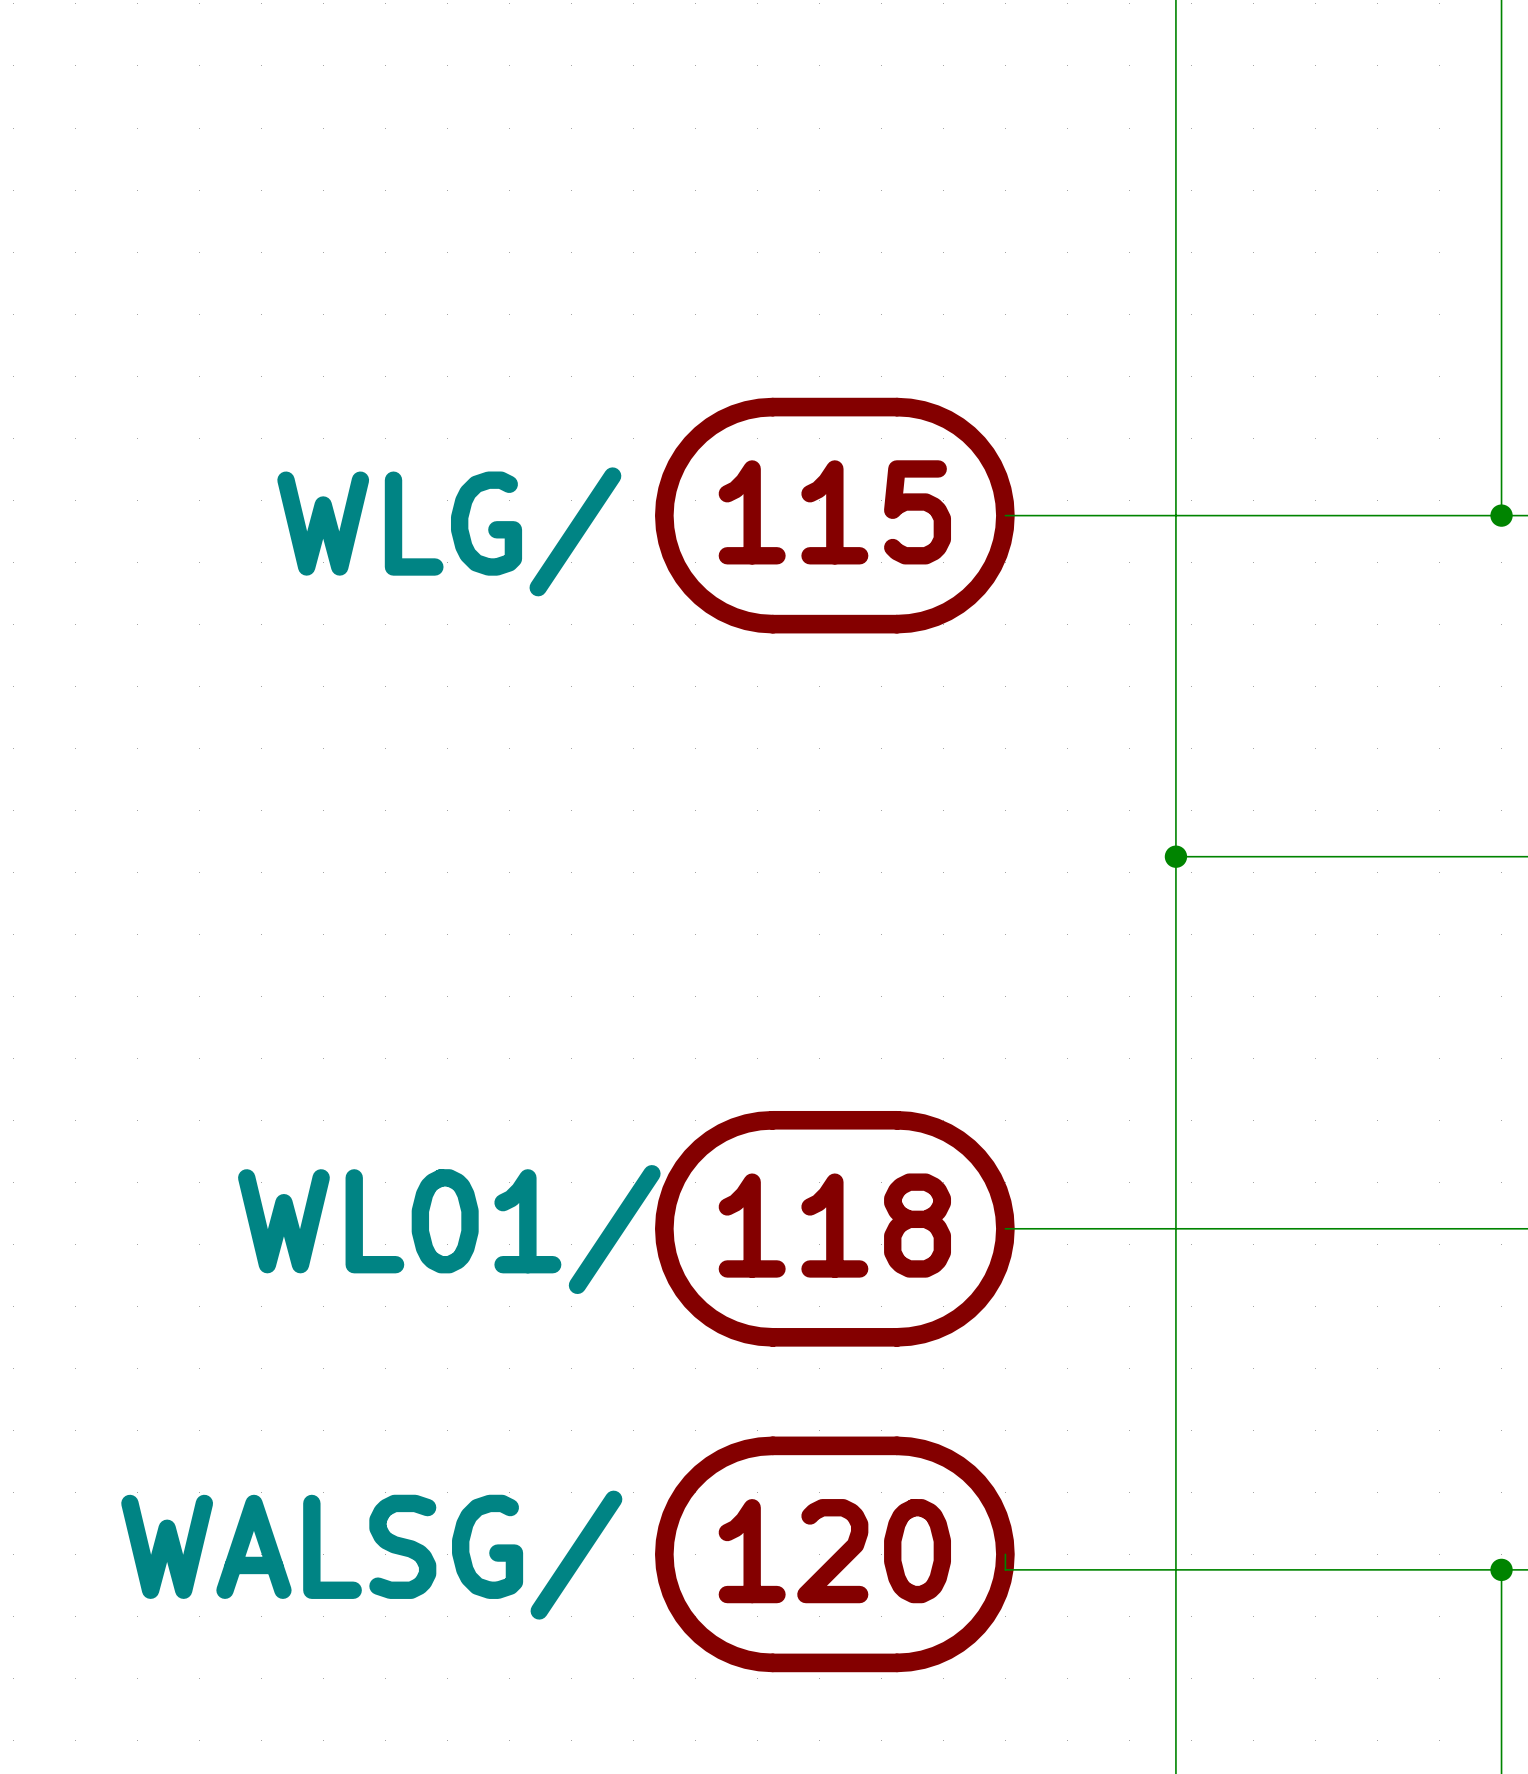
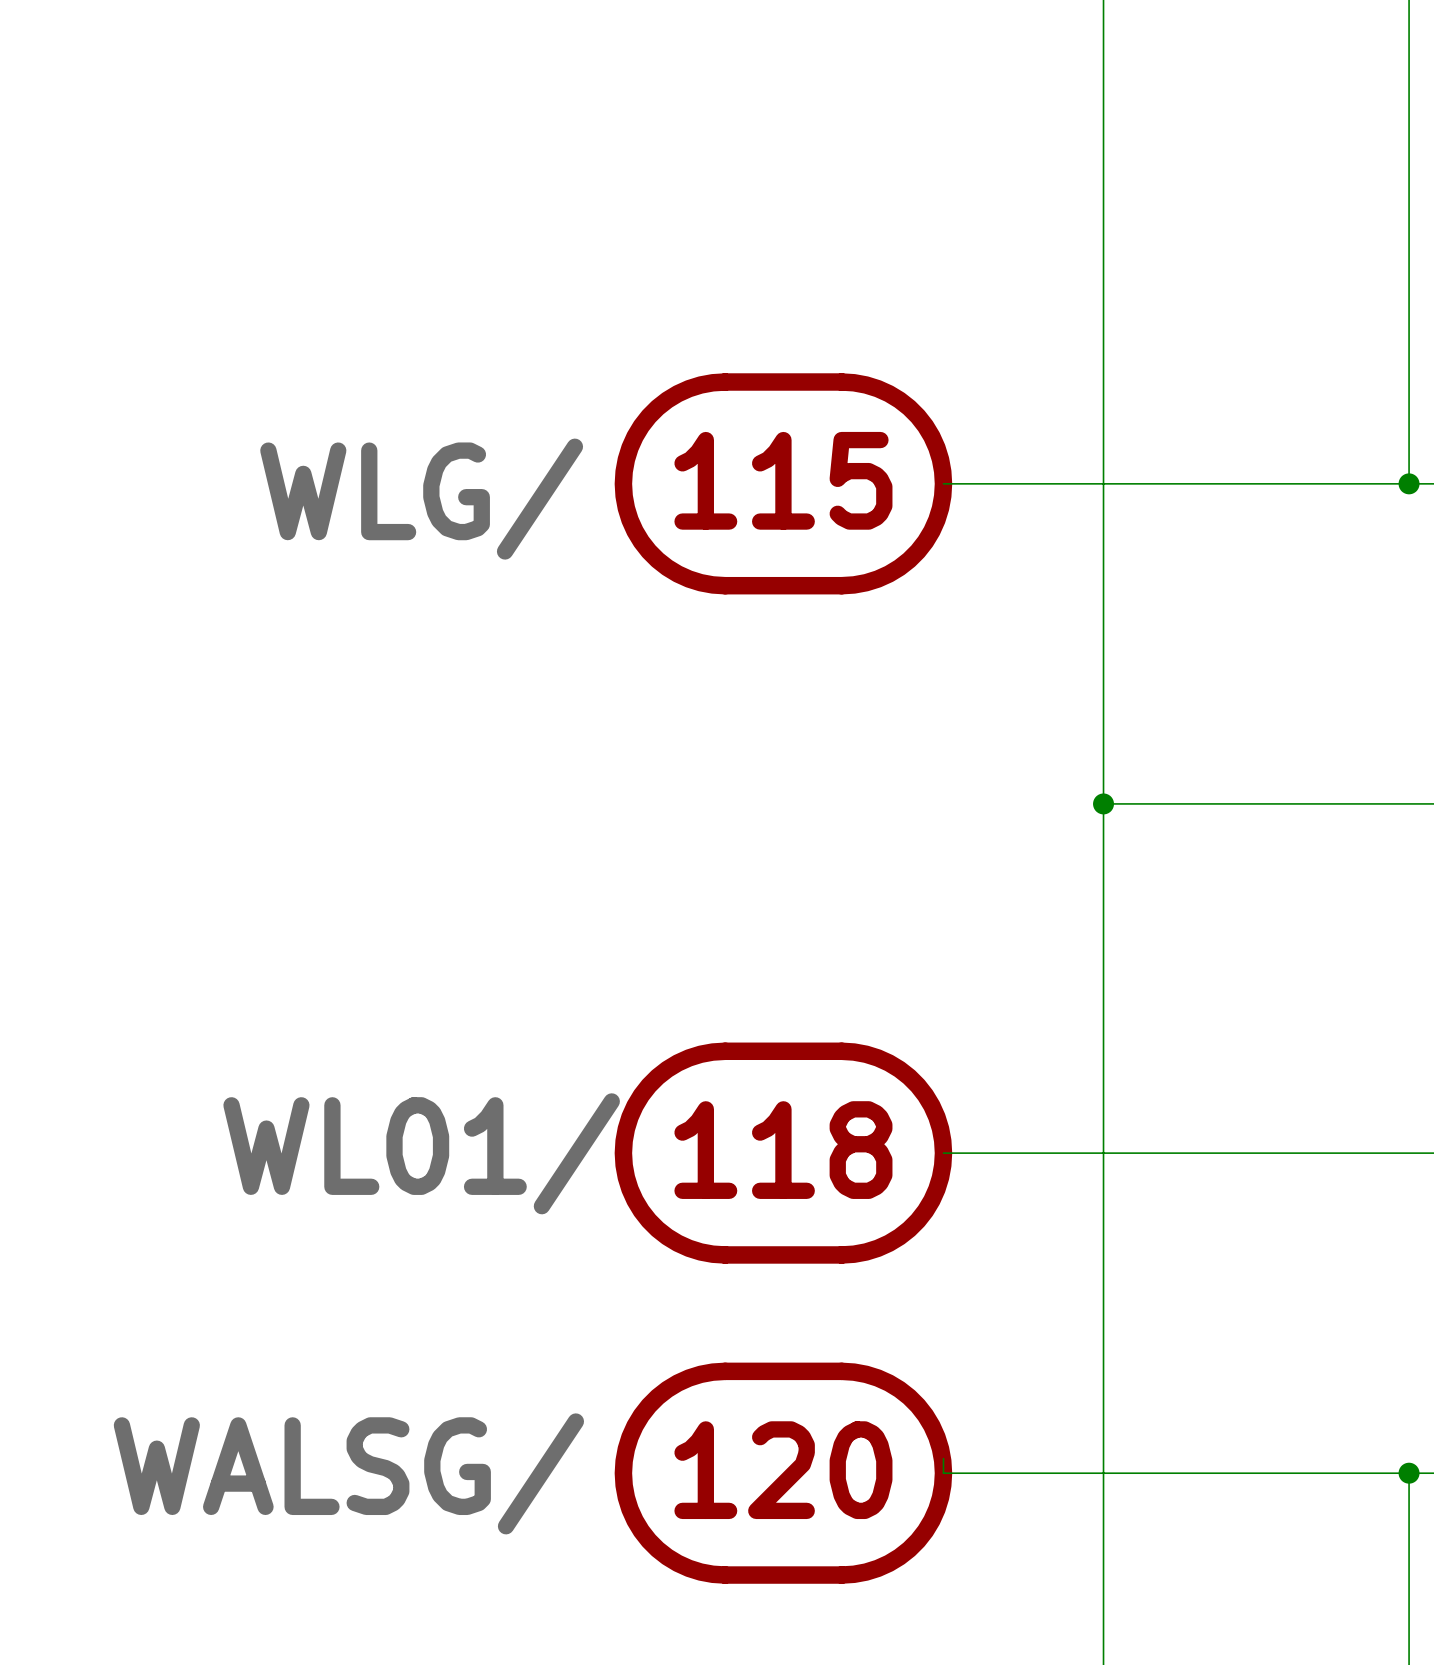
part position: (834, 1554) -> (783, 1473)

